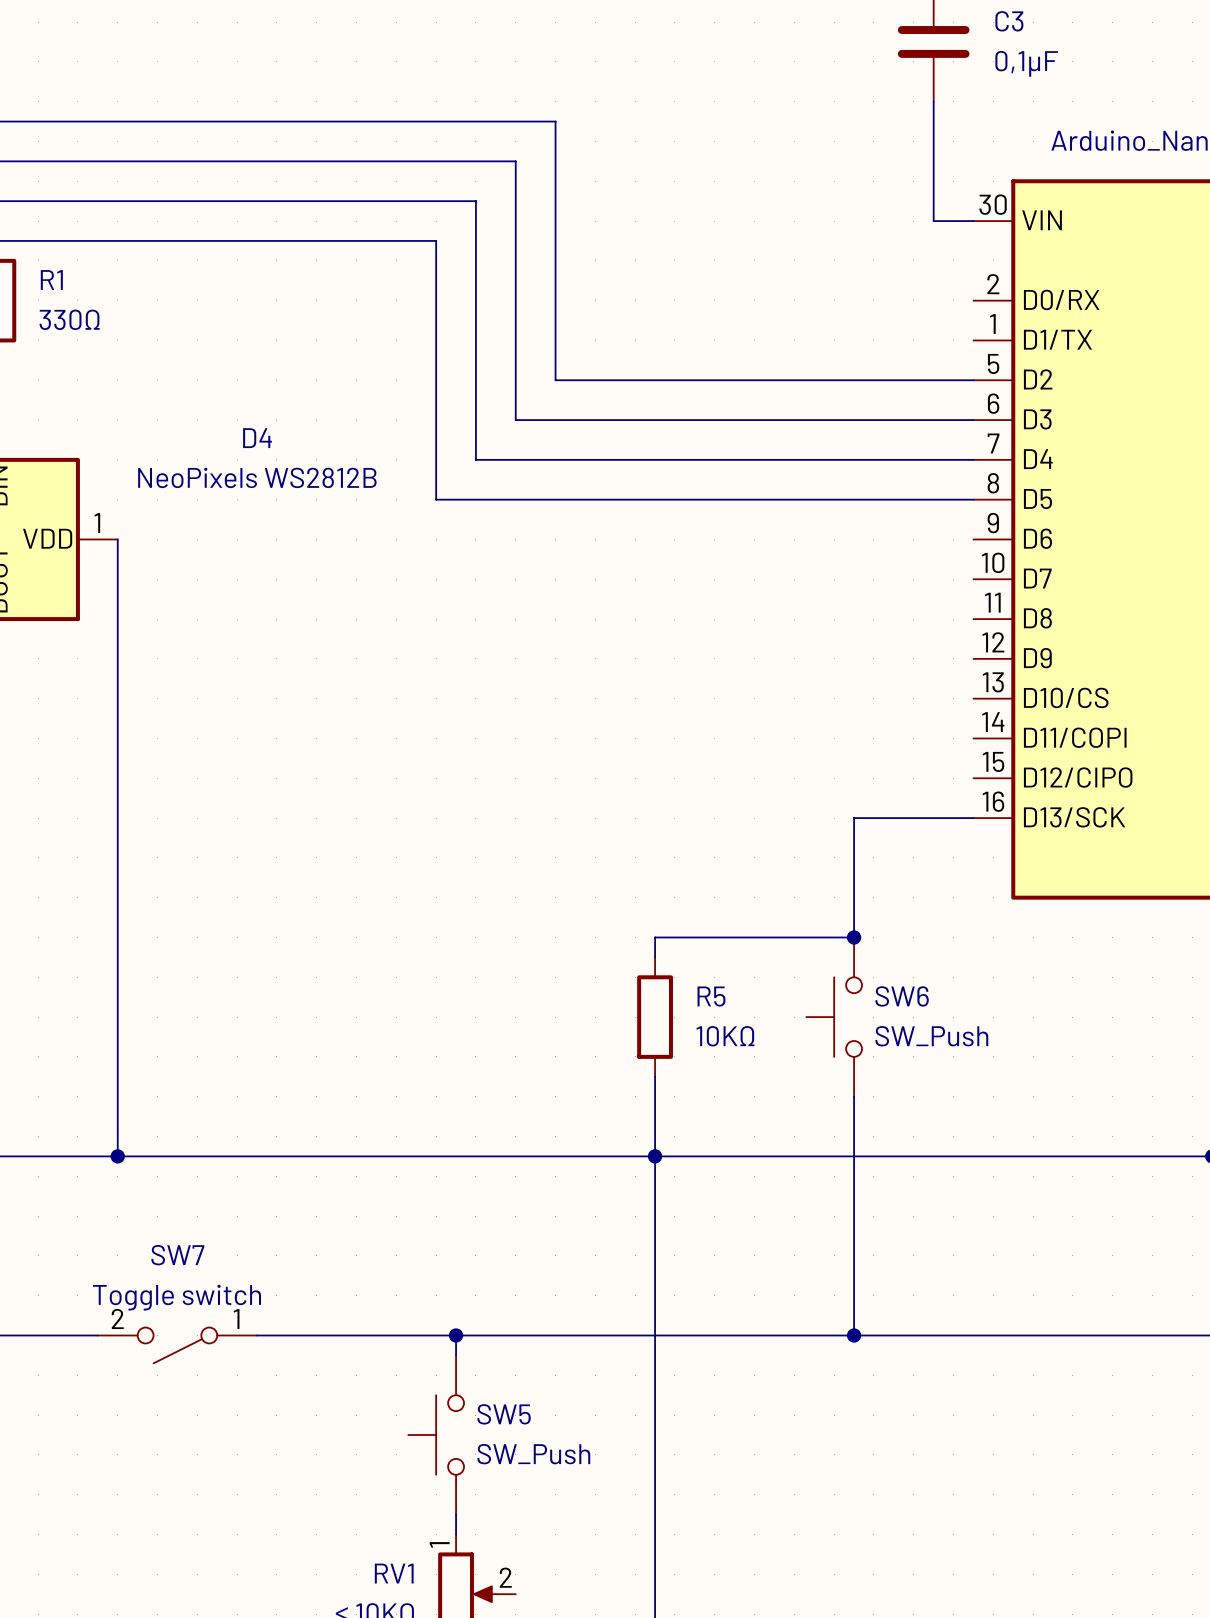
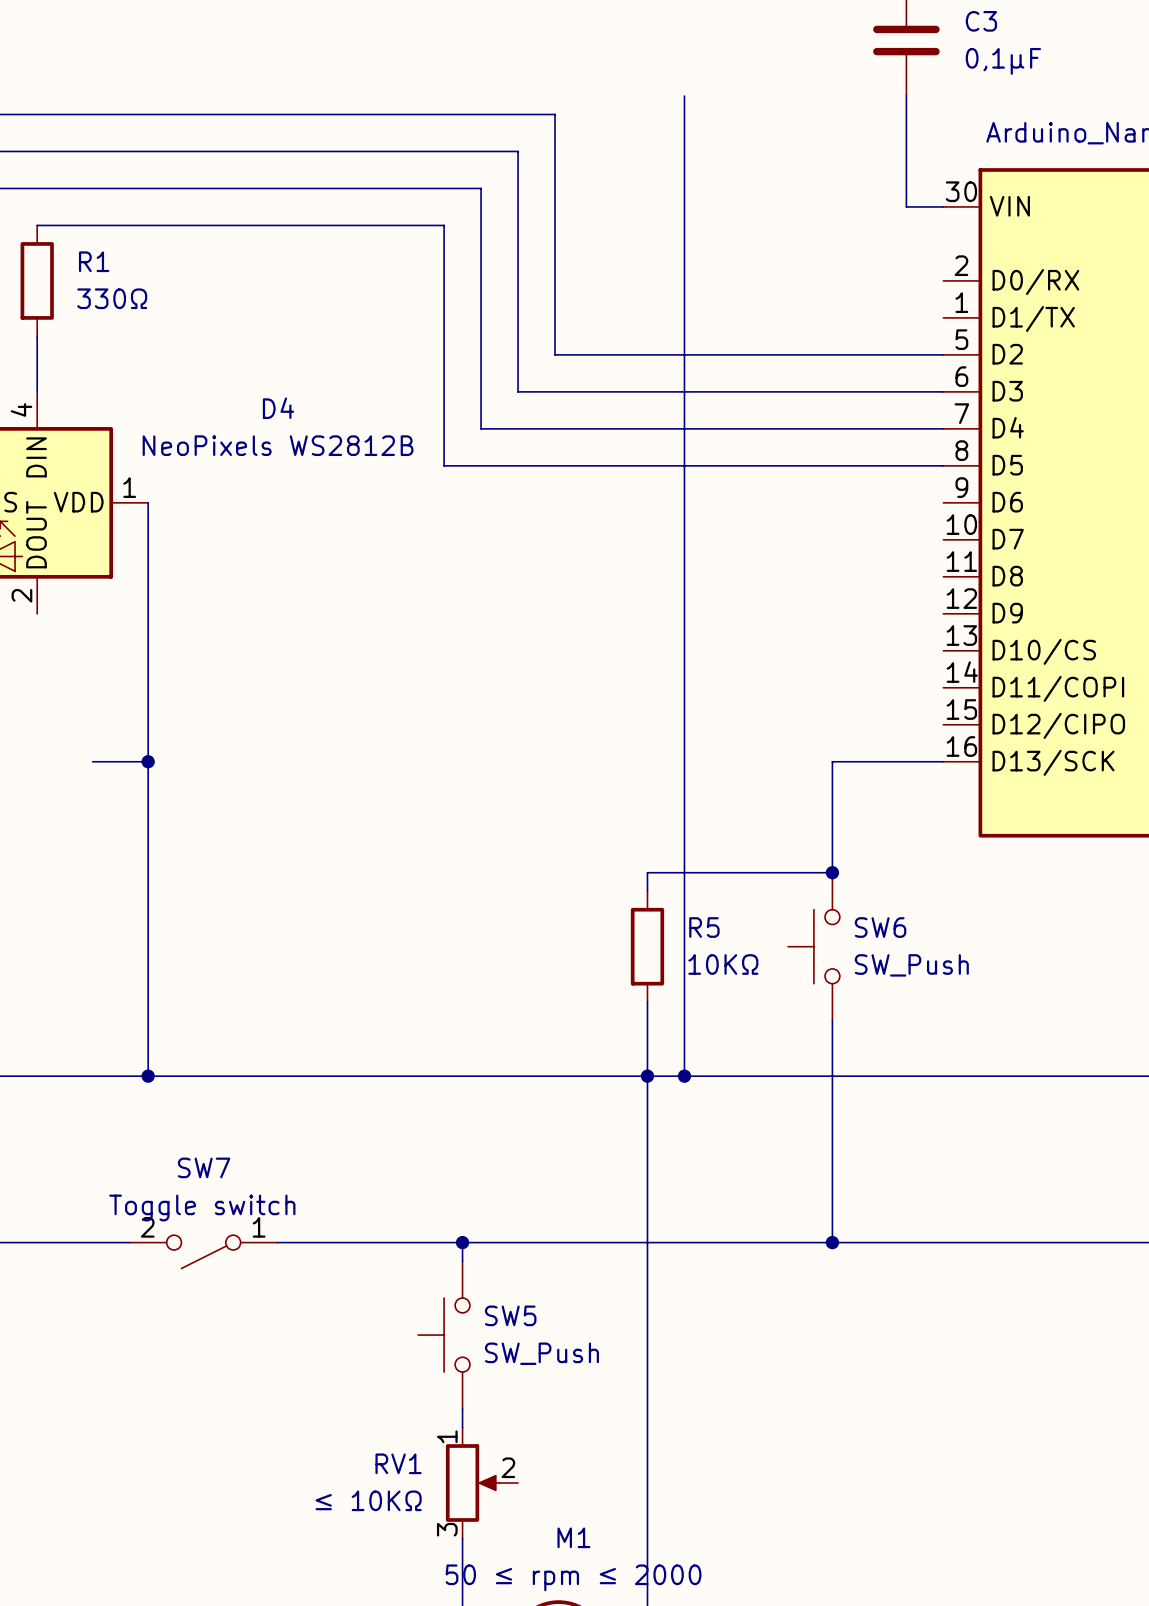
wire: none -> (684, 96) (684, 1076)
wire: none -> (92, 761) (148, 761)
junction: none -> (148, 761)
junction: none -> (684, 1076)

